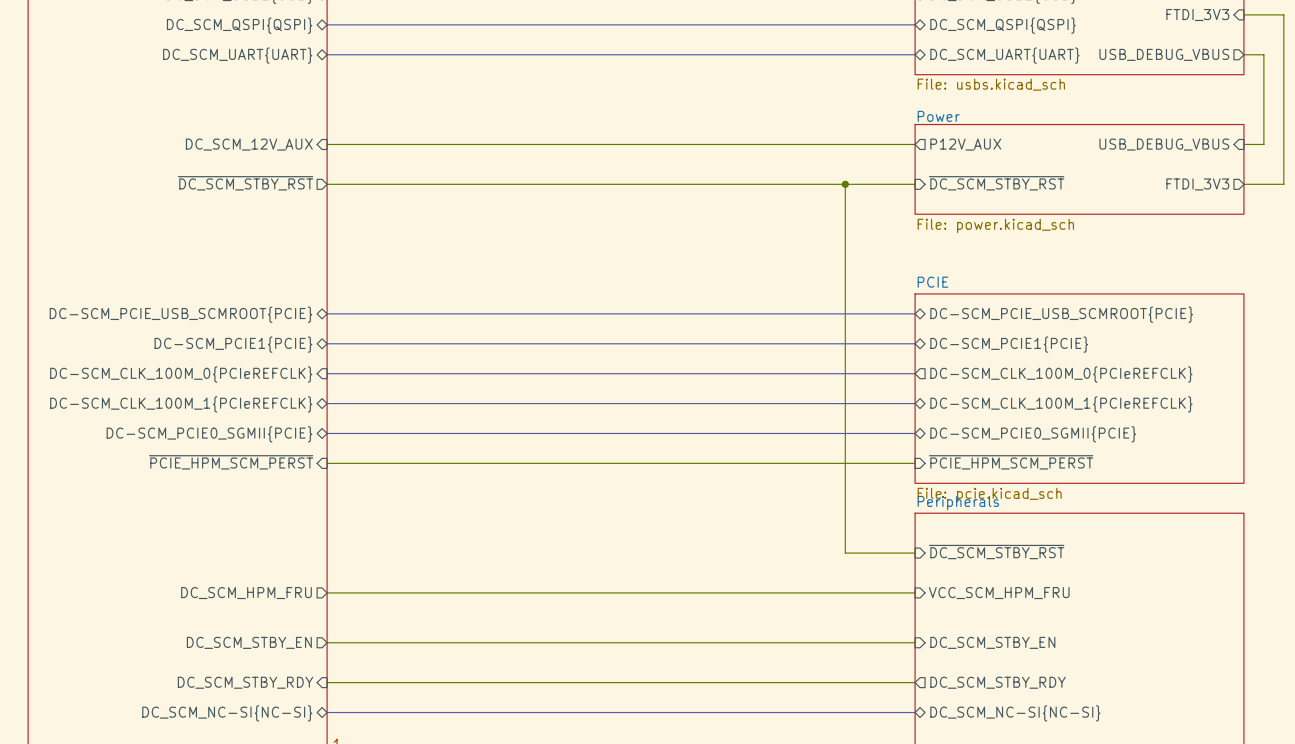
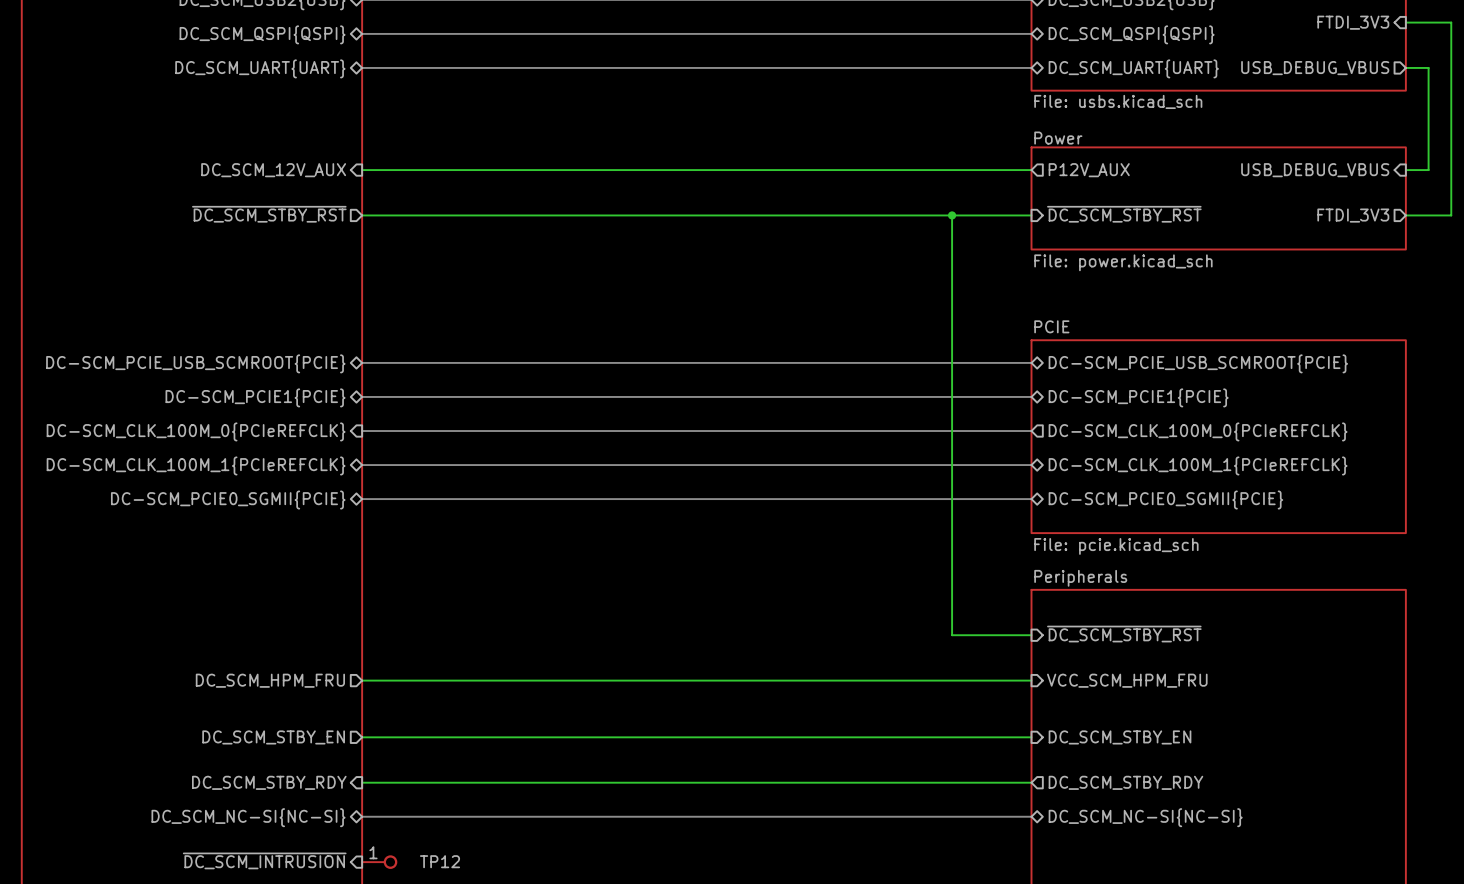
sheet PCIE: none -> File: pcie.kicad_sch (1218, 436)
sheet PCIE: File: pcie.kicad_sch (1079, 388) -> none
sheet pin: ~{PCIE_HPM_SCM_PERST} (231, 462) -> none
sheet pin: ~{PCIE_HPM_SCM_PERST} (1011, 462) -> none
wire: (327, 463) (915, 463) -> none

